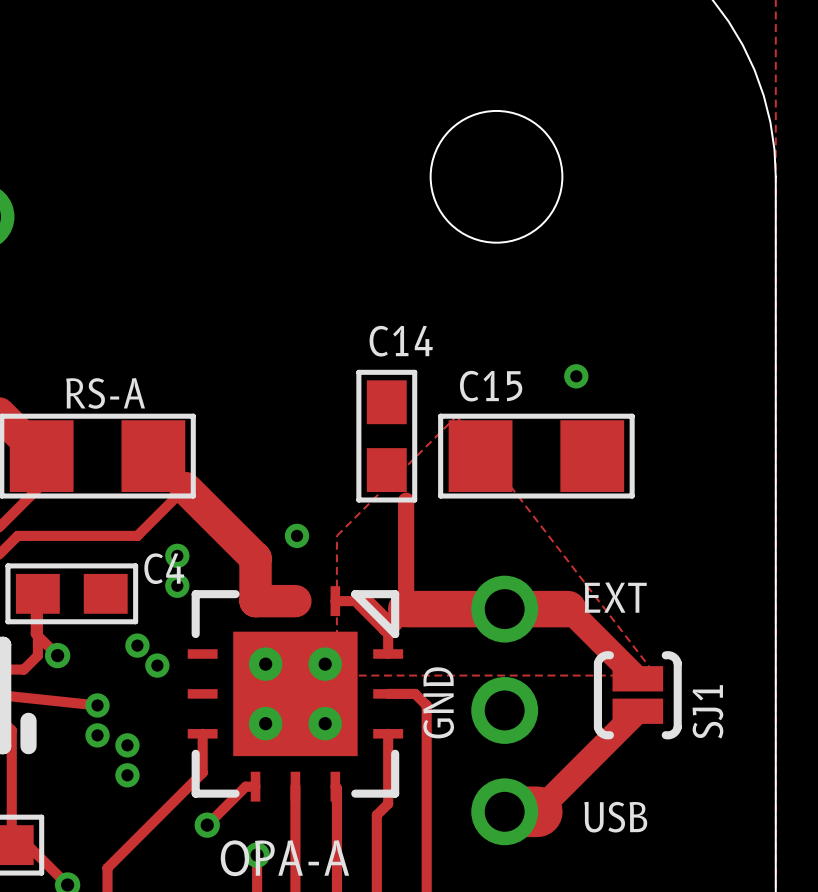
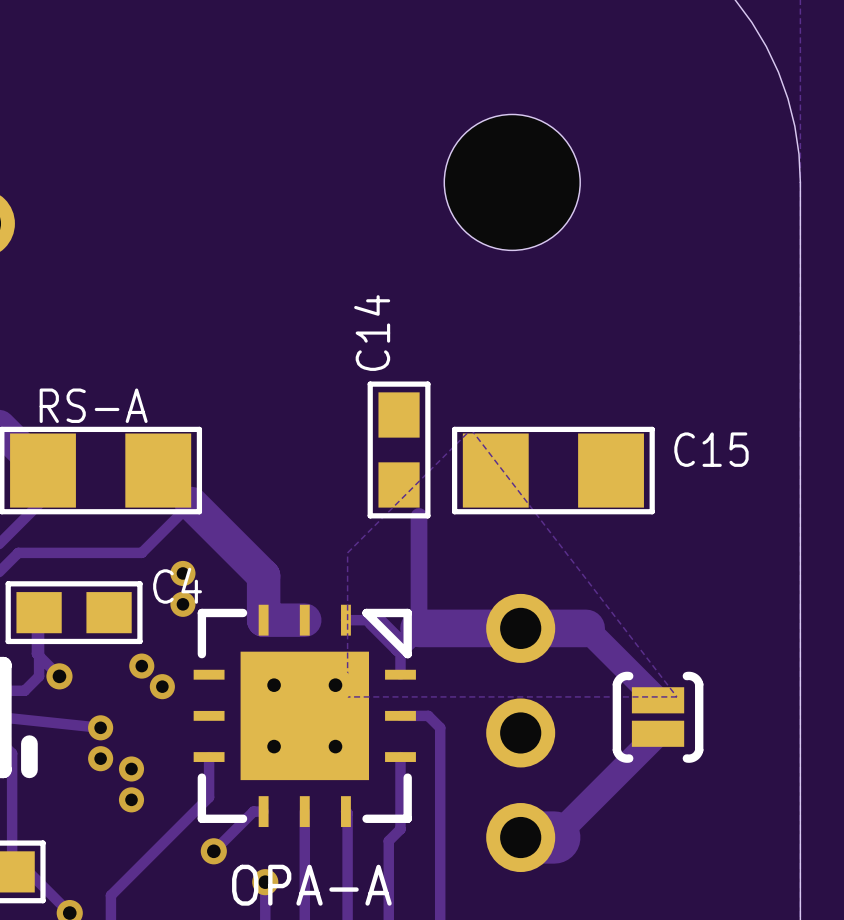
C14 name rotation: 0° (401, 341) -> 90° counterclockwise (372, 333)
via: (576, 376) -> none
C15 name position: C15 (491, 386) -> C15 (711, 449)
via: (297, 535) -> none
text: EXT (615, 597) -> none
text: GND (438, 702) -> none
text: SJ1 (707, 711) -> none
text: USB (615, 817) -> none

